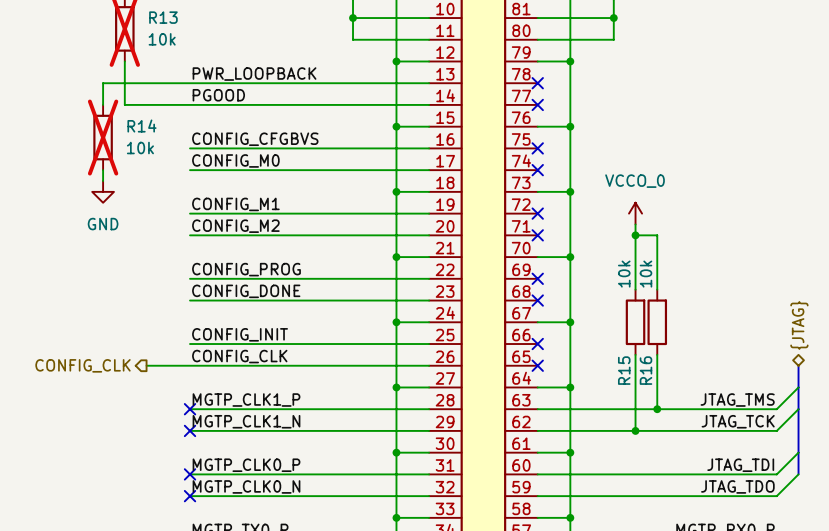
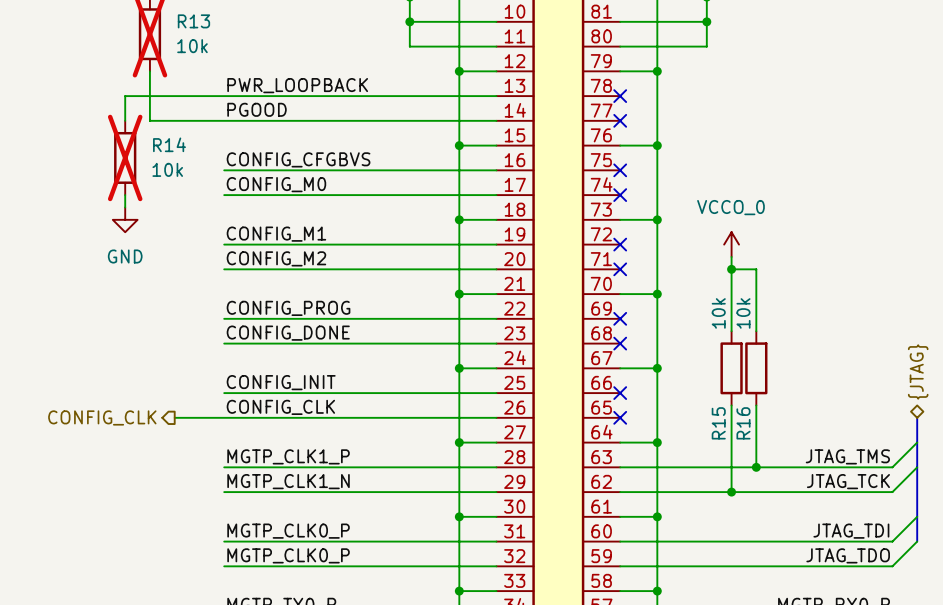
no-connect mark: (190, 409) -> none
no-connect mark: (190, 430) -> none
no-connect mark: (190, 474) -> none
label: MGTP_CLK0_N (246, 486) -> MGTP_CLK0_P (288, 555)
no-connect mark: (190, 496) -> none

